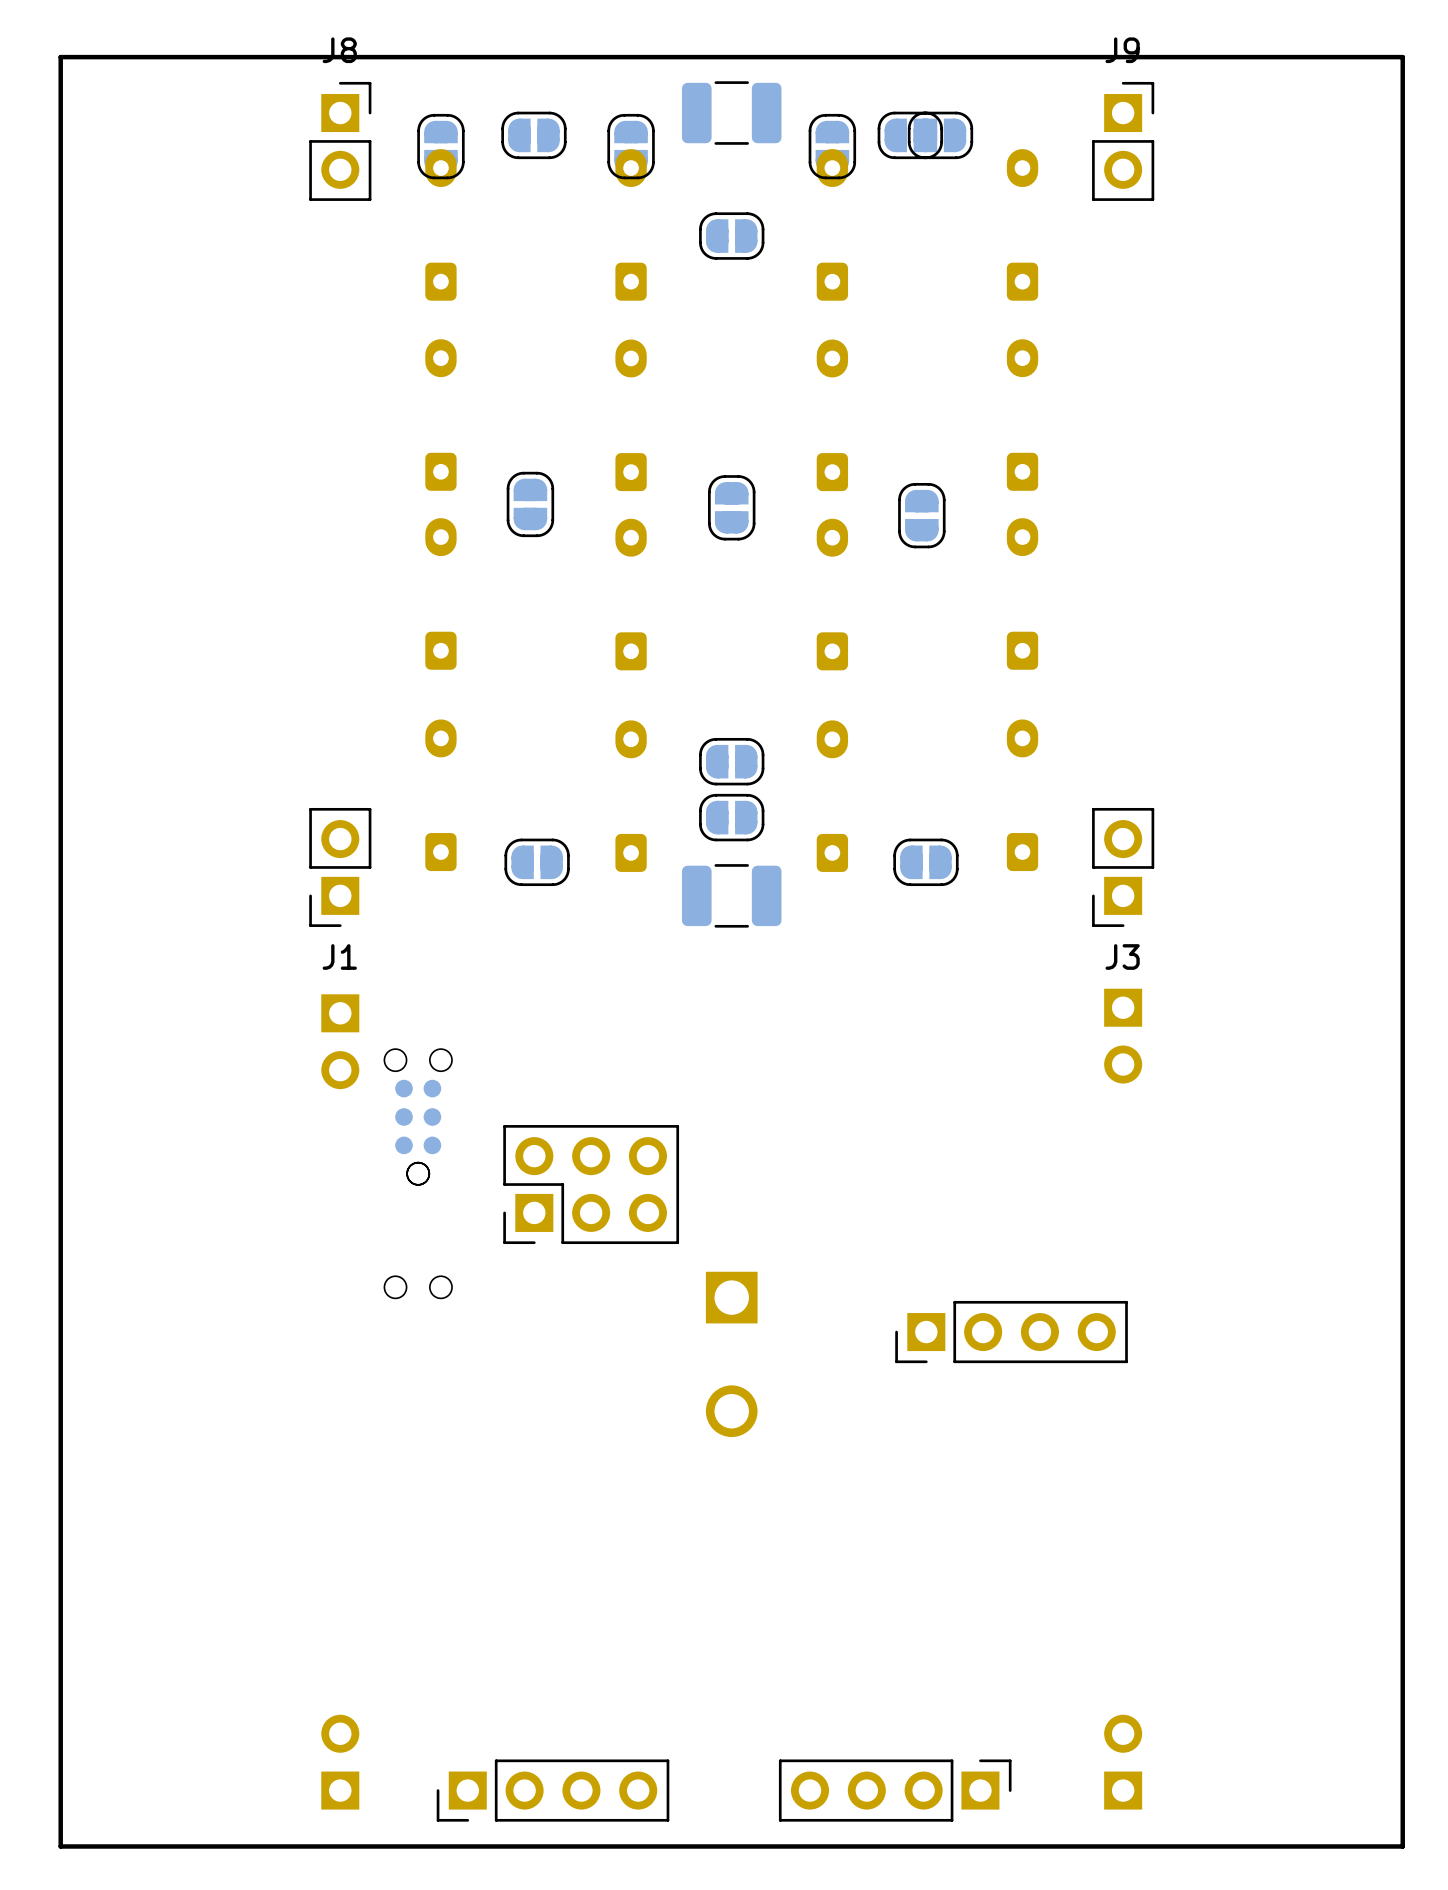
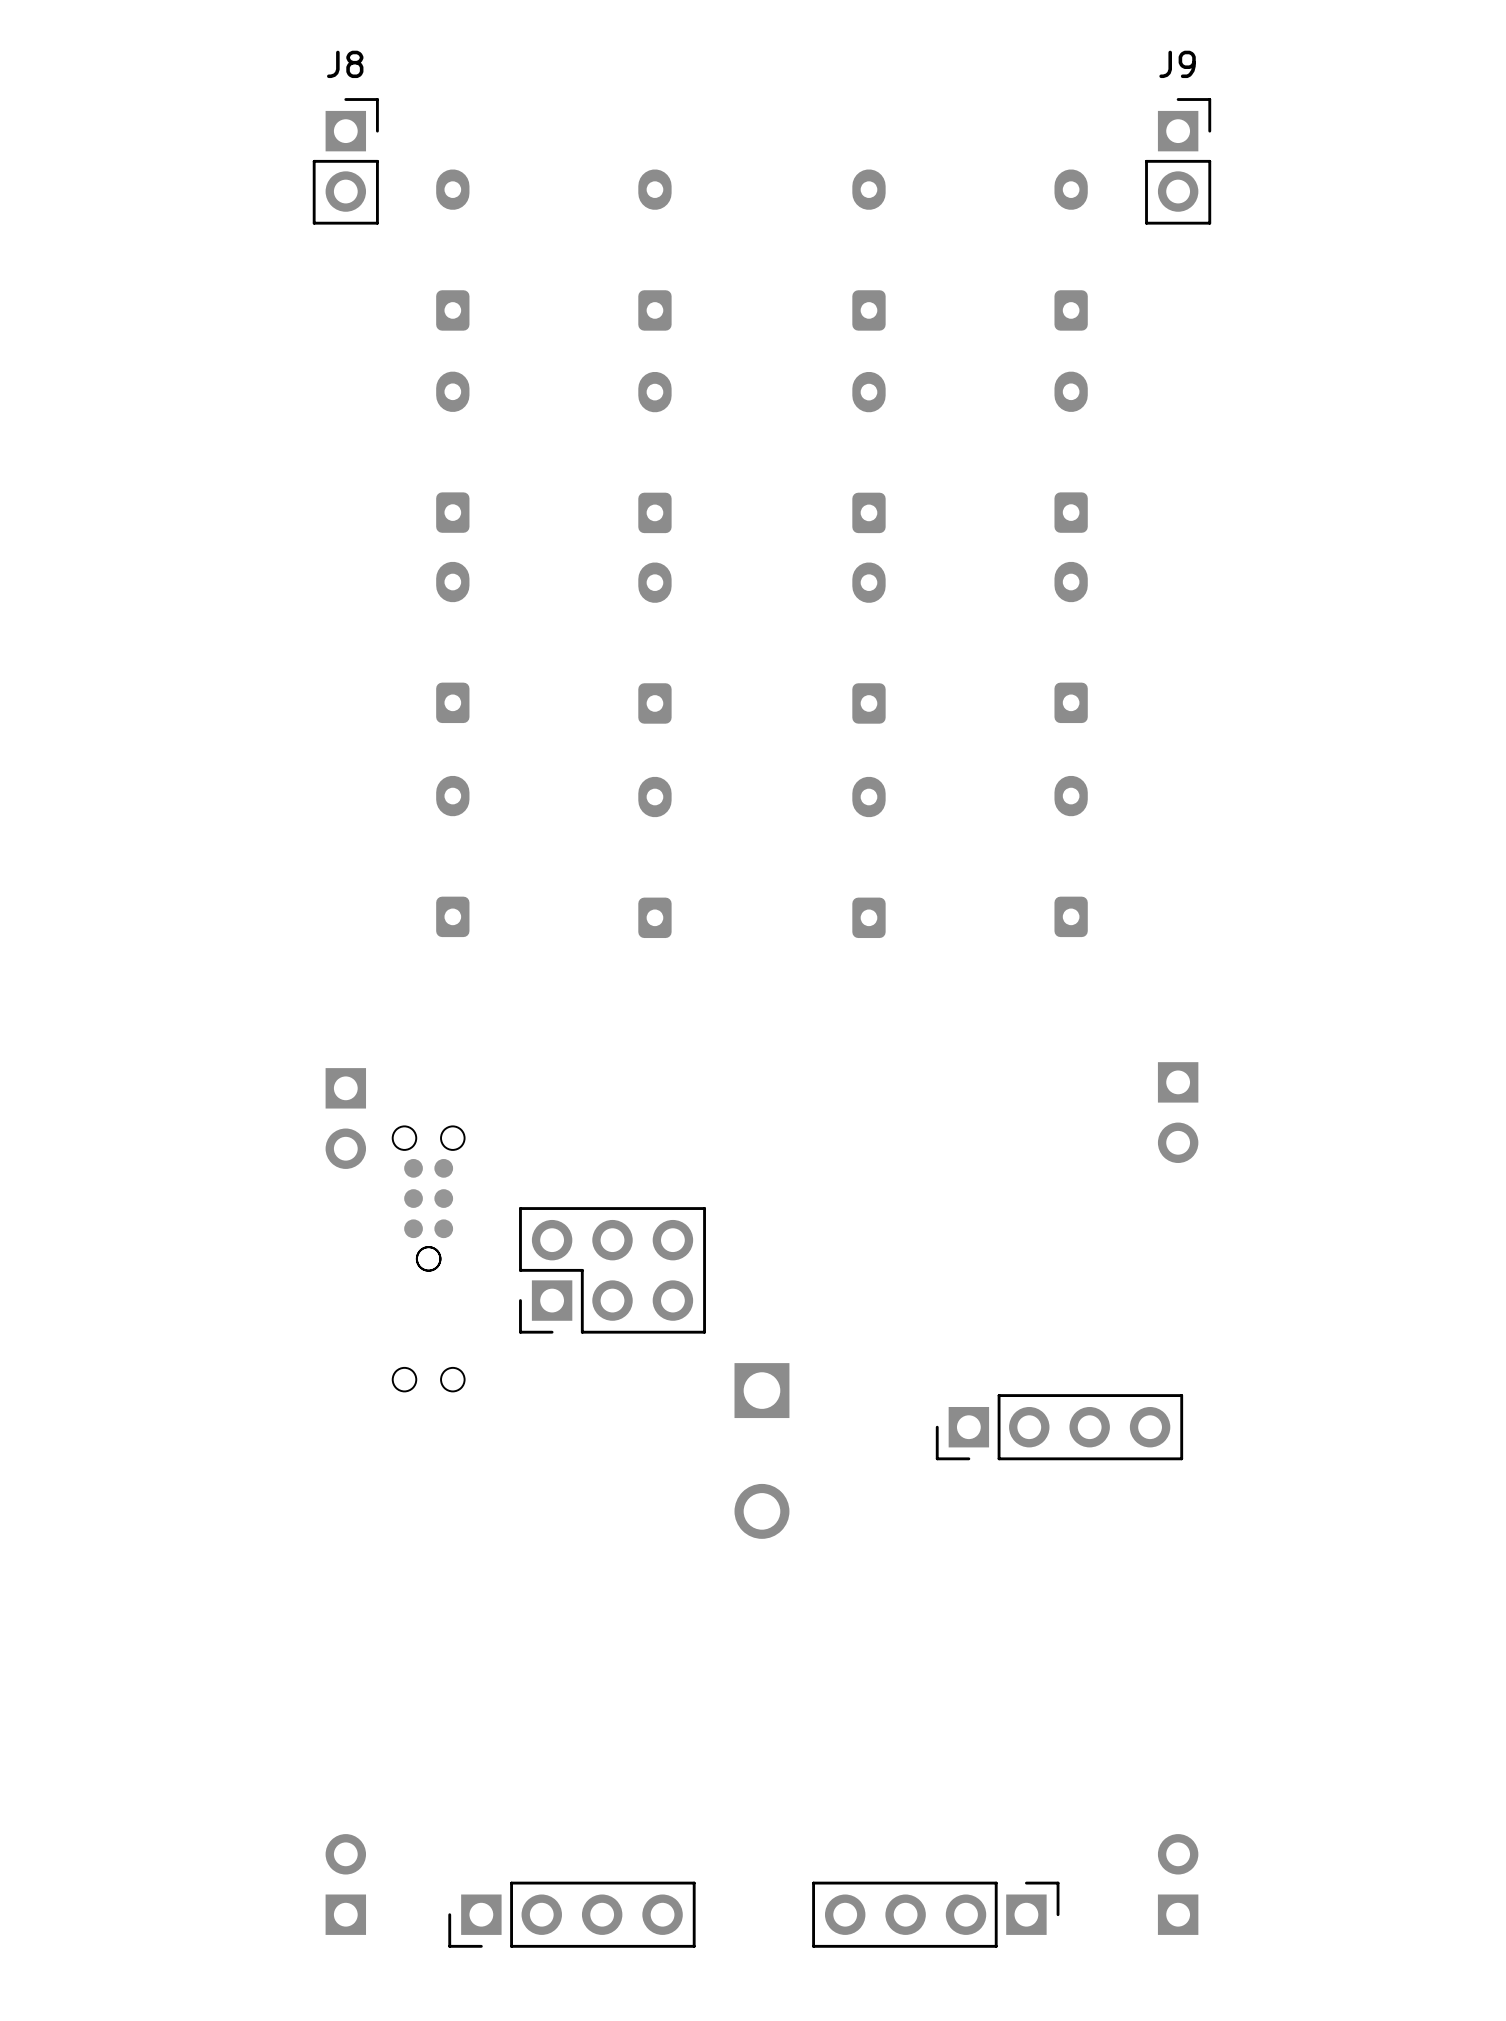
board edge: (1402, 57) (60, 57) (60, 1846) (1402, 1846) (1402, 57) -> none
part: (731, 113) -> none
part: (533, 135) -> none
part: (910, 135) -> none
part: (940, 135) -> none
part: (440, 146) -> none
part: (631, 146) -> none
part: (832, 146) -> none
part: (731, 236) -> none
part: (530, 504) -> none
part: (731, 507) -> none
part: (921, 515) -> none
part: (731, 761) -> none
part: (731, 817) -> none
part: (537, 862) -> none
part: (925, 862) -> none
J1: (340, 867) -> none
J3: (1123, 867) -> none
part: (731, 895) -> none

